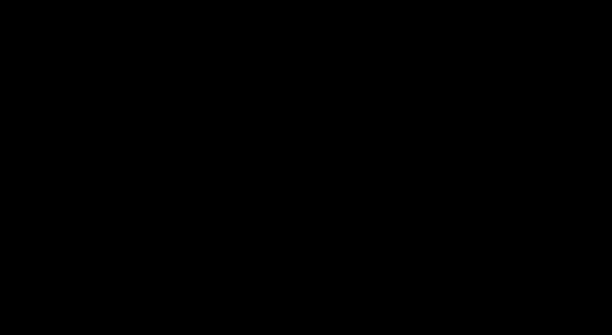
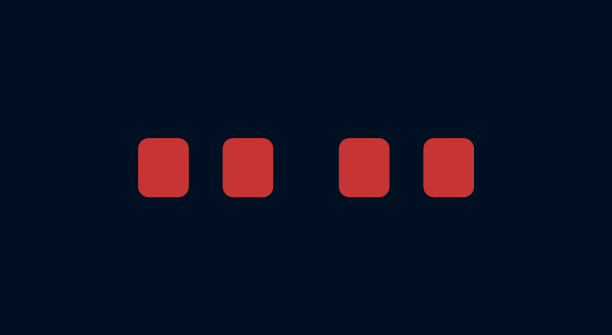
part: none -> (205, 167)
part: none -> (406, 167)

